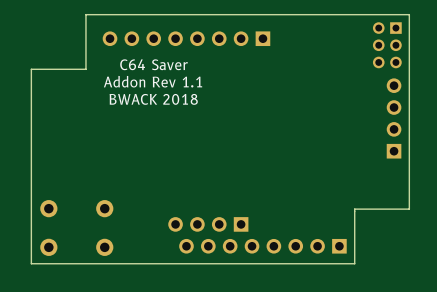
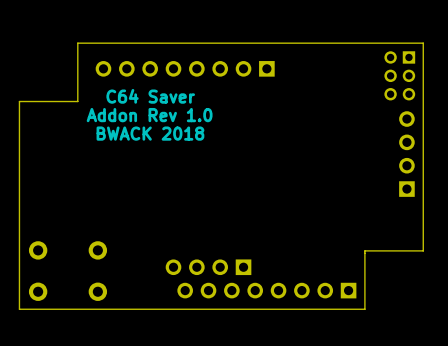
text: Addon Rev 1.1 (153, 81) -> Addon Rev 1.0 (149, 115)

